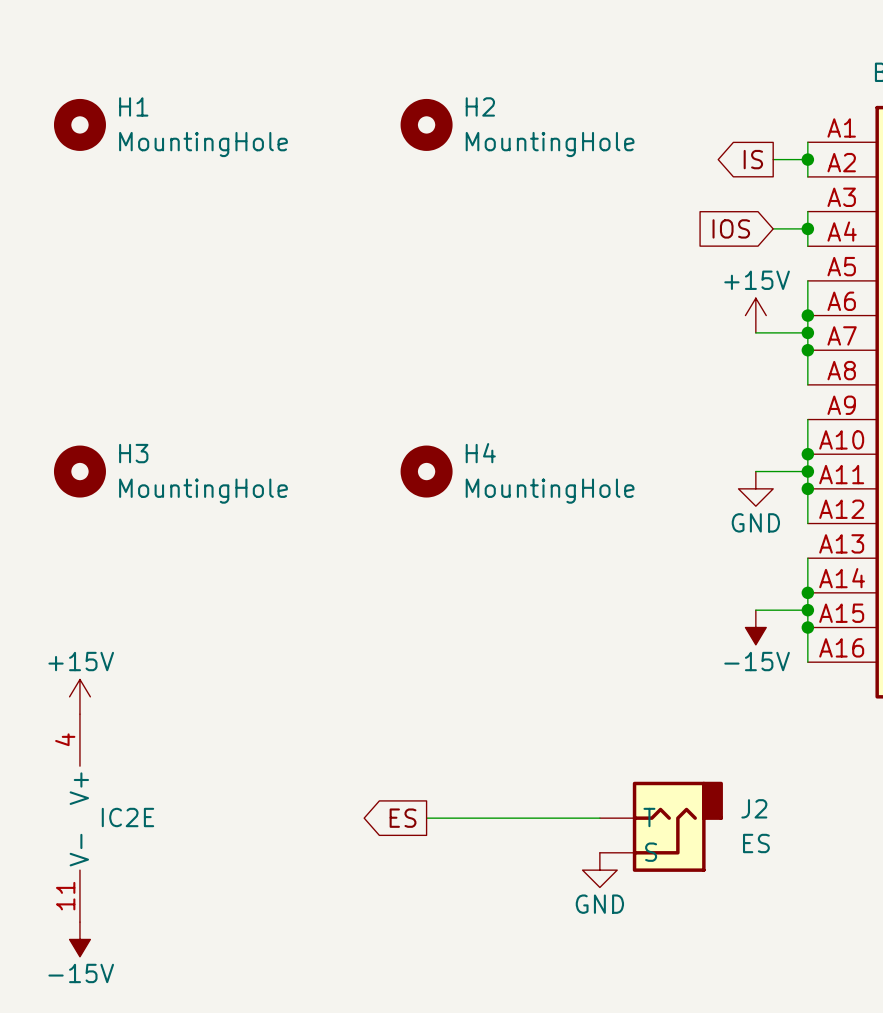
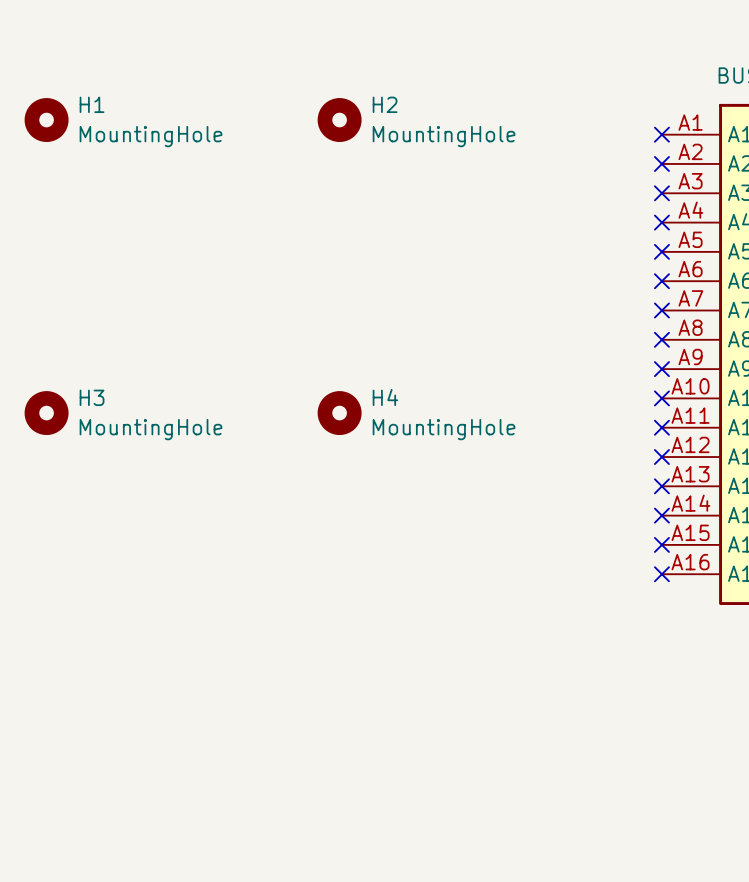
wire: (807, 142) (807, 176) -> none
no-connect mark: none -> (661, 134)
global label: IS (753, 159) -> none
wire: (773, 159) (807, 159) -> none
junction: (807, 159) -> none
no-connect mark: none -> (661, 163)
wire: (807, 211) (807, 246) -> none
no-connect mark: none -> (661, 193)
global label: IOS (731, 228) -> none
wire: (773, 228) (807, 228) -> none
junction: (807, 228) -> none
no-connect mark: none -> (661, 222)
wire: (807, 280) (807, 384) -> none
no-connect mark: none -> (661, 251)
power symbol: +15V (755, 315) -> none
junction: (807, 315) -> none
no-connect mark: none -> (661, 281)
wire: (755, 332) (807, 332) -> none
junction: (807, 332) -> none
junction: (807, 350) -> none
no-connect mark: none -> (661, 310)
no-connect mark: none -> (661, 339)
wire: (807, 419) (807, 523) -> none
no-connect mark: none -> (661, 369)
junction: (807, 454) -> none
no-connect mark: none -> (661, 398)
wire: (755, 471) (807, 471) -> none
junction: (807, 471) -> none
power symbol: GND (755, 488) -> none
junction: (807, 488) -> none
no-connect mark: none -> (661, 427)
no-connect mark: none -> (661, 457)
wire: (807, 558) (807, 662) -> none
no-connect mark: none -> (661, 486)
junction: (807, 592) -> none
no-connect mark: none -> (661, 515)
wire: (755, 610) (807, 610) -> none
junction: (807, 610) -> none
power symbol: -15V (755, 627) -> none
junction: (807, 627) -> none
no-connect mark: none -> (661, 544)
no-connect mark: none -> (661, 574)
power symbol: +15V (79, 696) -> none
IC2E: (79, 818) -> none
global label: ES (403, 818) -> none
wire: (426, 818) (599, 818) -> none
J2: ES (661, 826) -> none
power symbol: GND (599, 870) -> none
power symbol: -15V (79, 939) -> none

